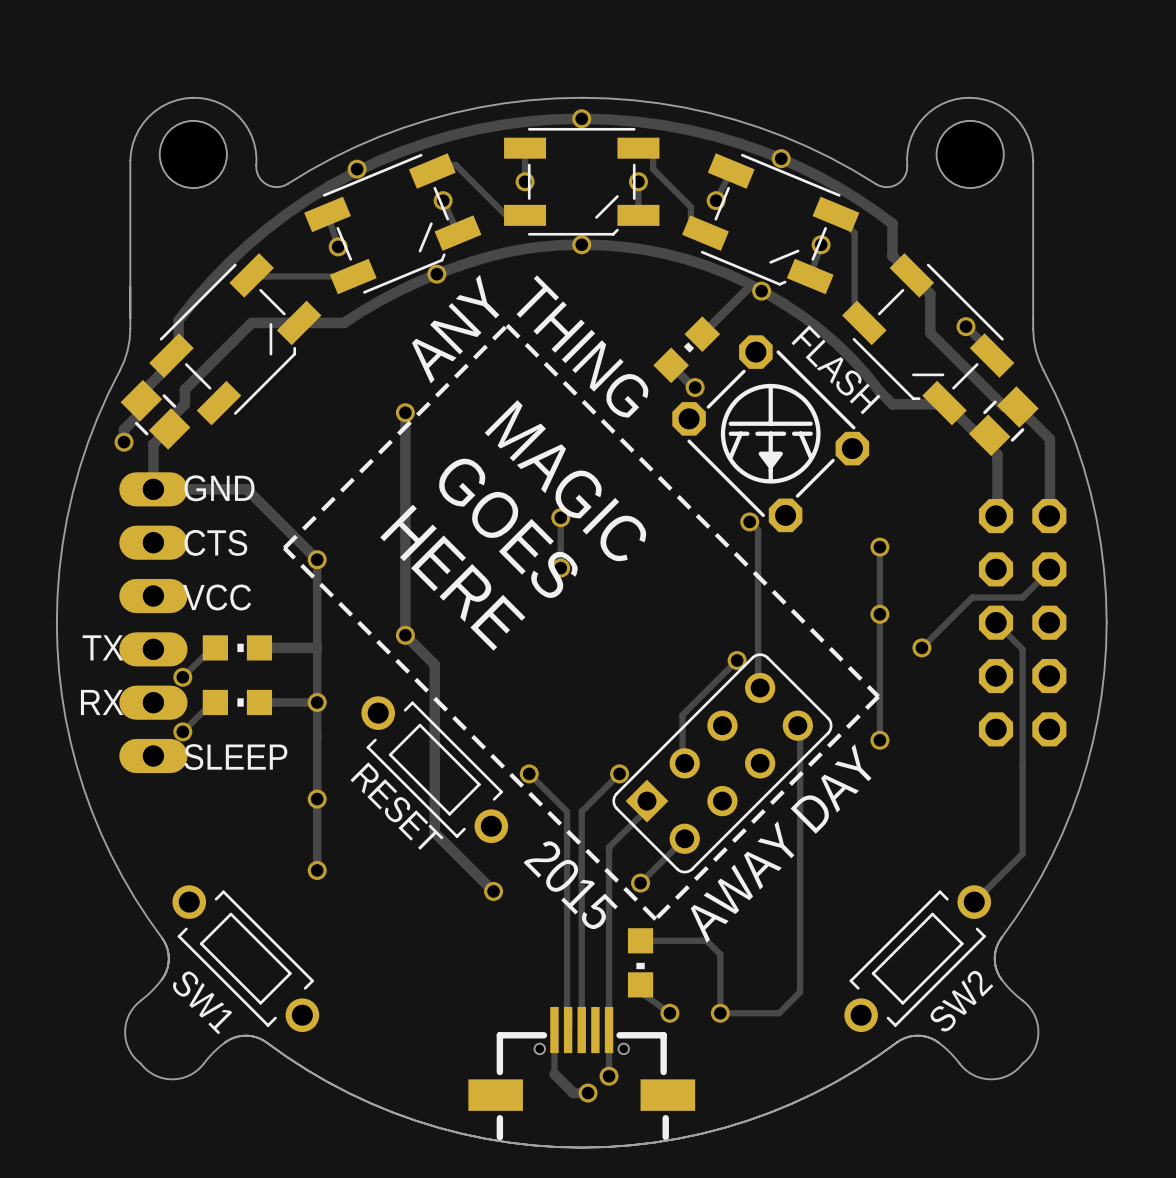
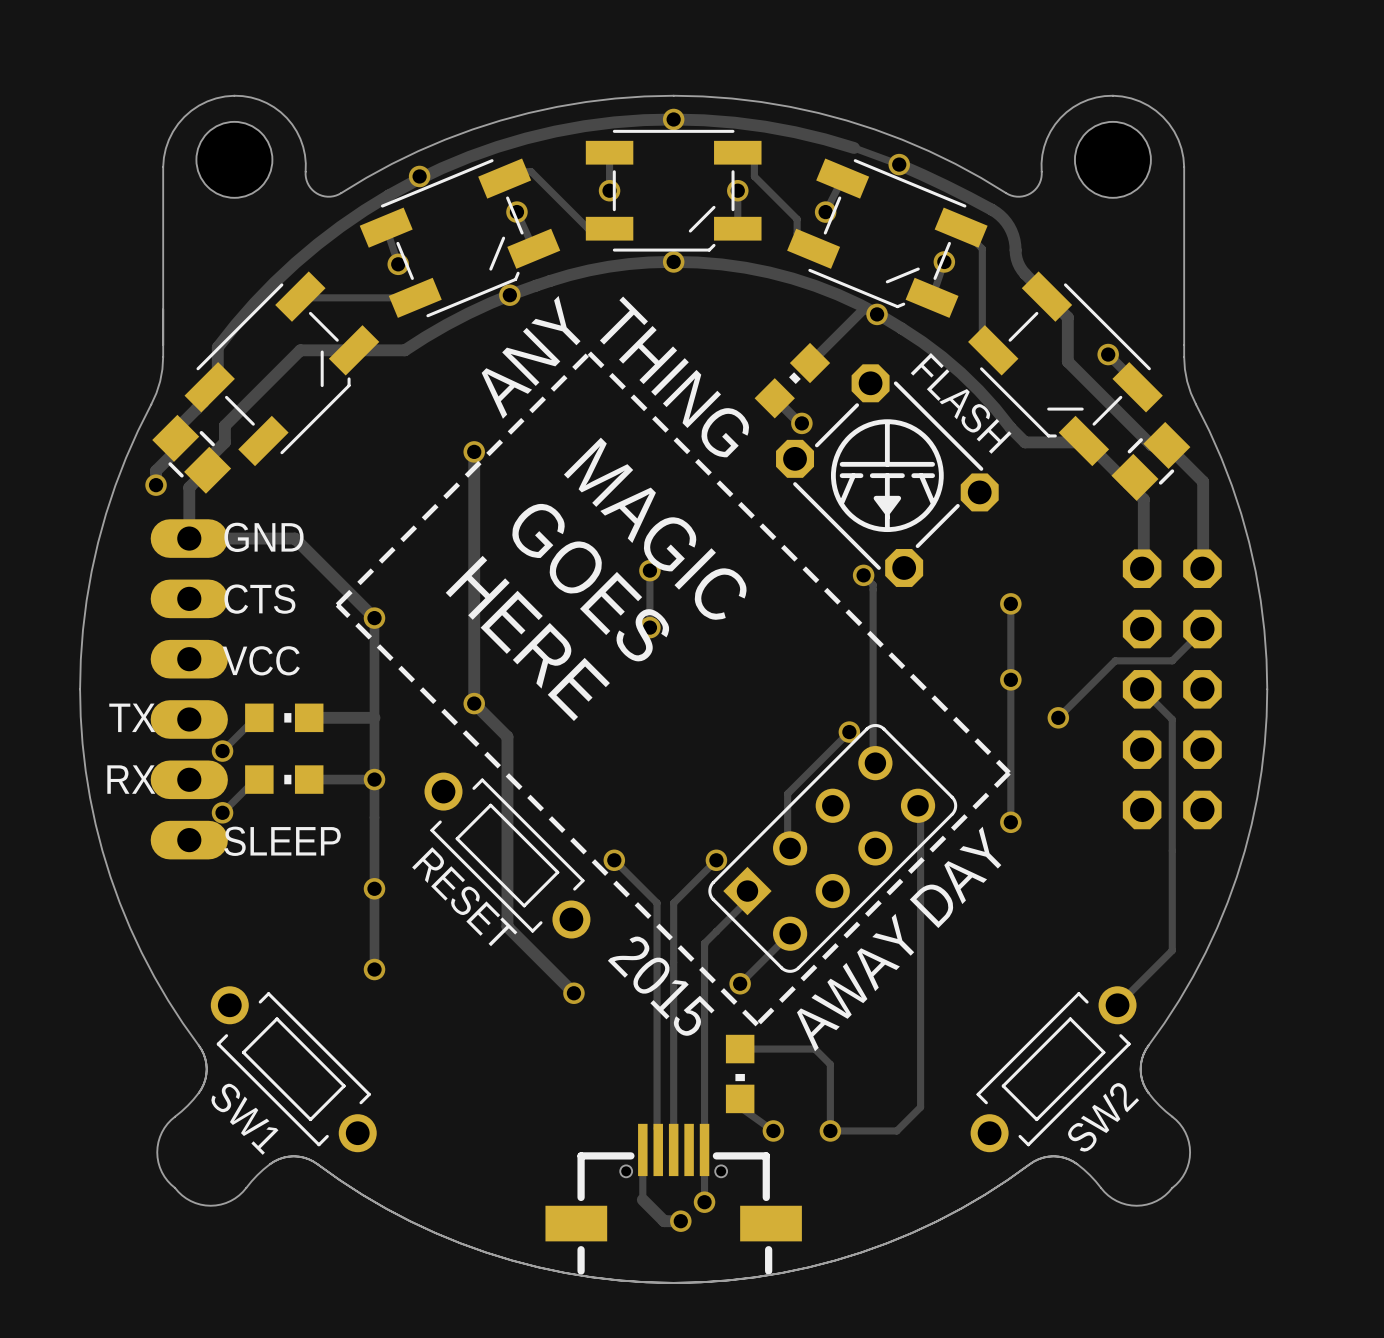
track: (741, 143) (781, 158) (820, 177) (857, 198) (892, 223) (892, 256) (911, 275) -> (899, 164) (969, 197) (999, 215) (1009, 226) (1013, 235) (1019, 266) (1046, 296)

